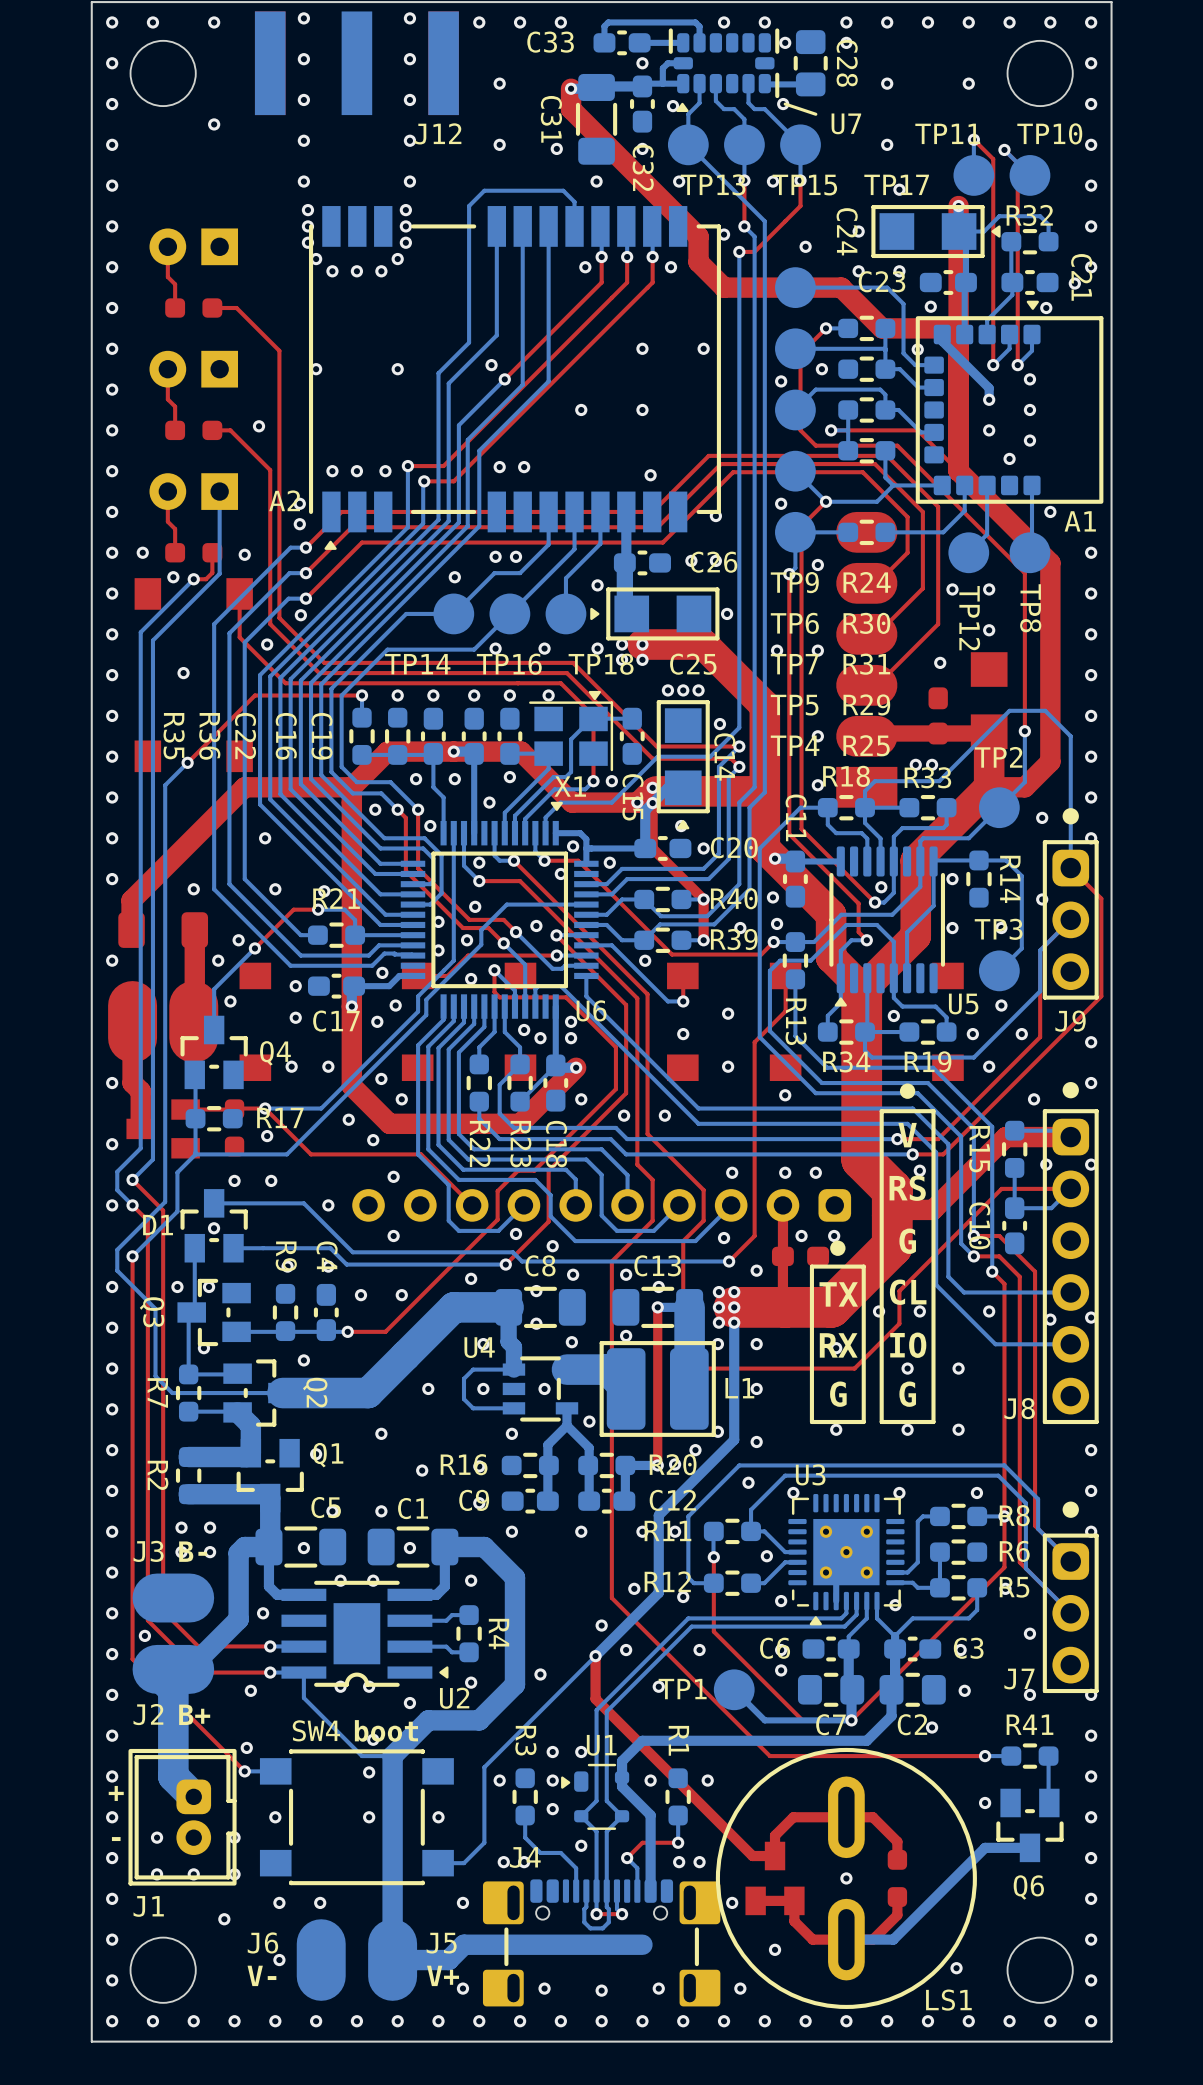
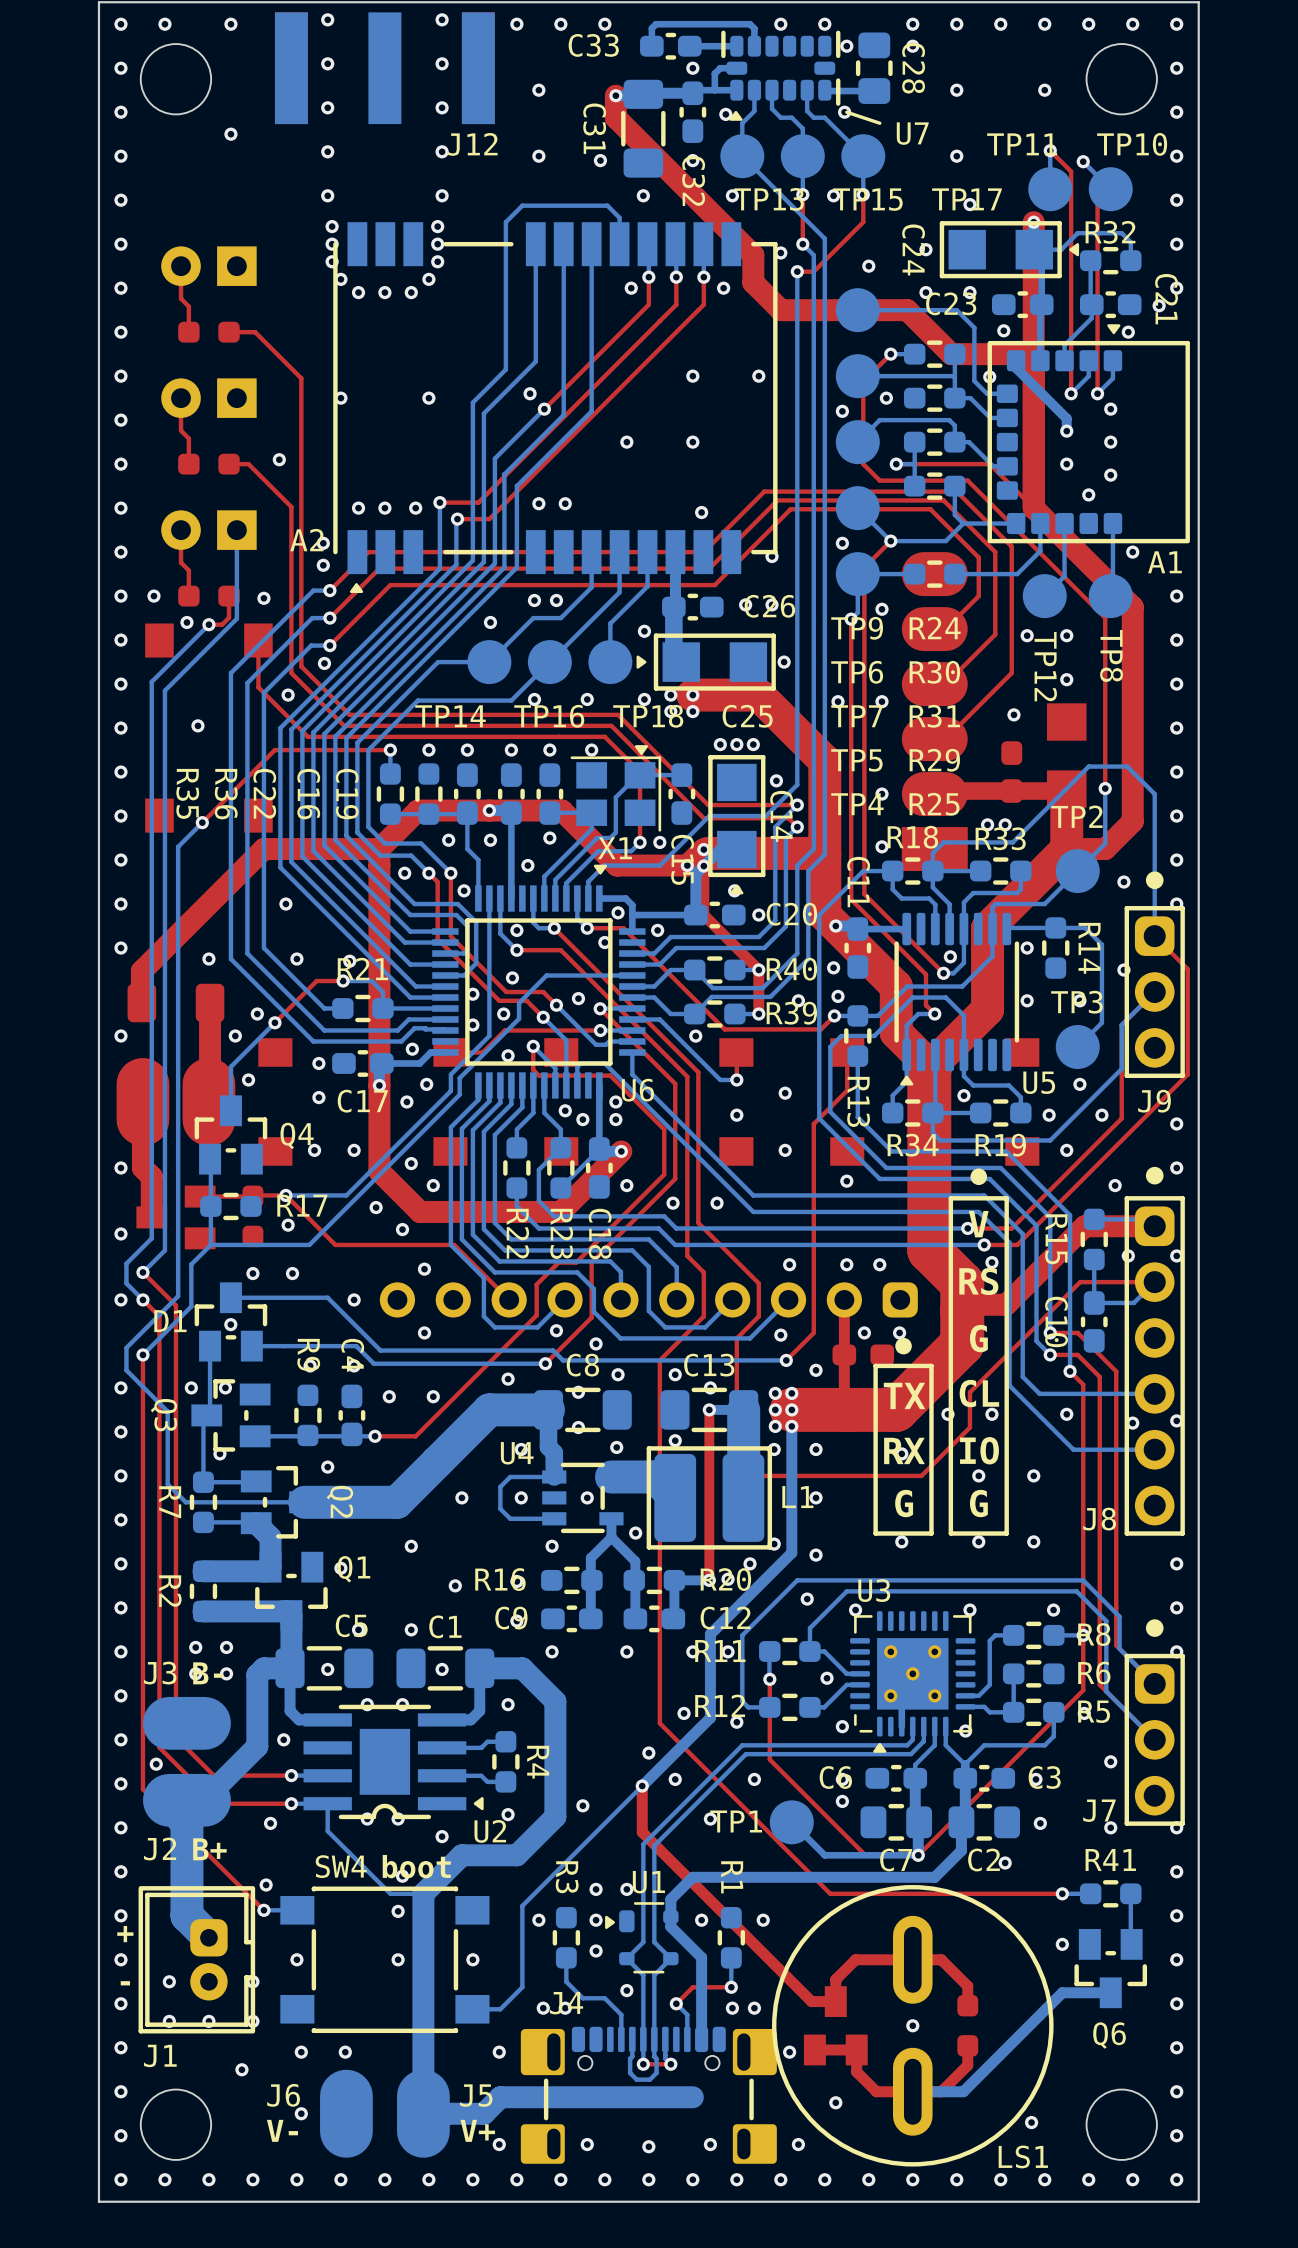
bottom track: (933, 861) (933, 905) (907, 932) (907, 978) -> none

